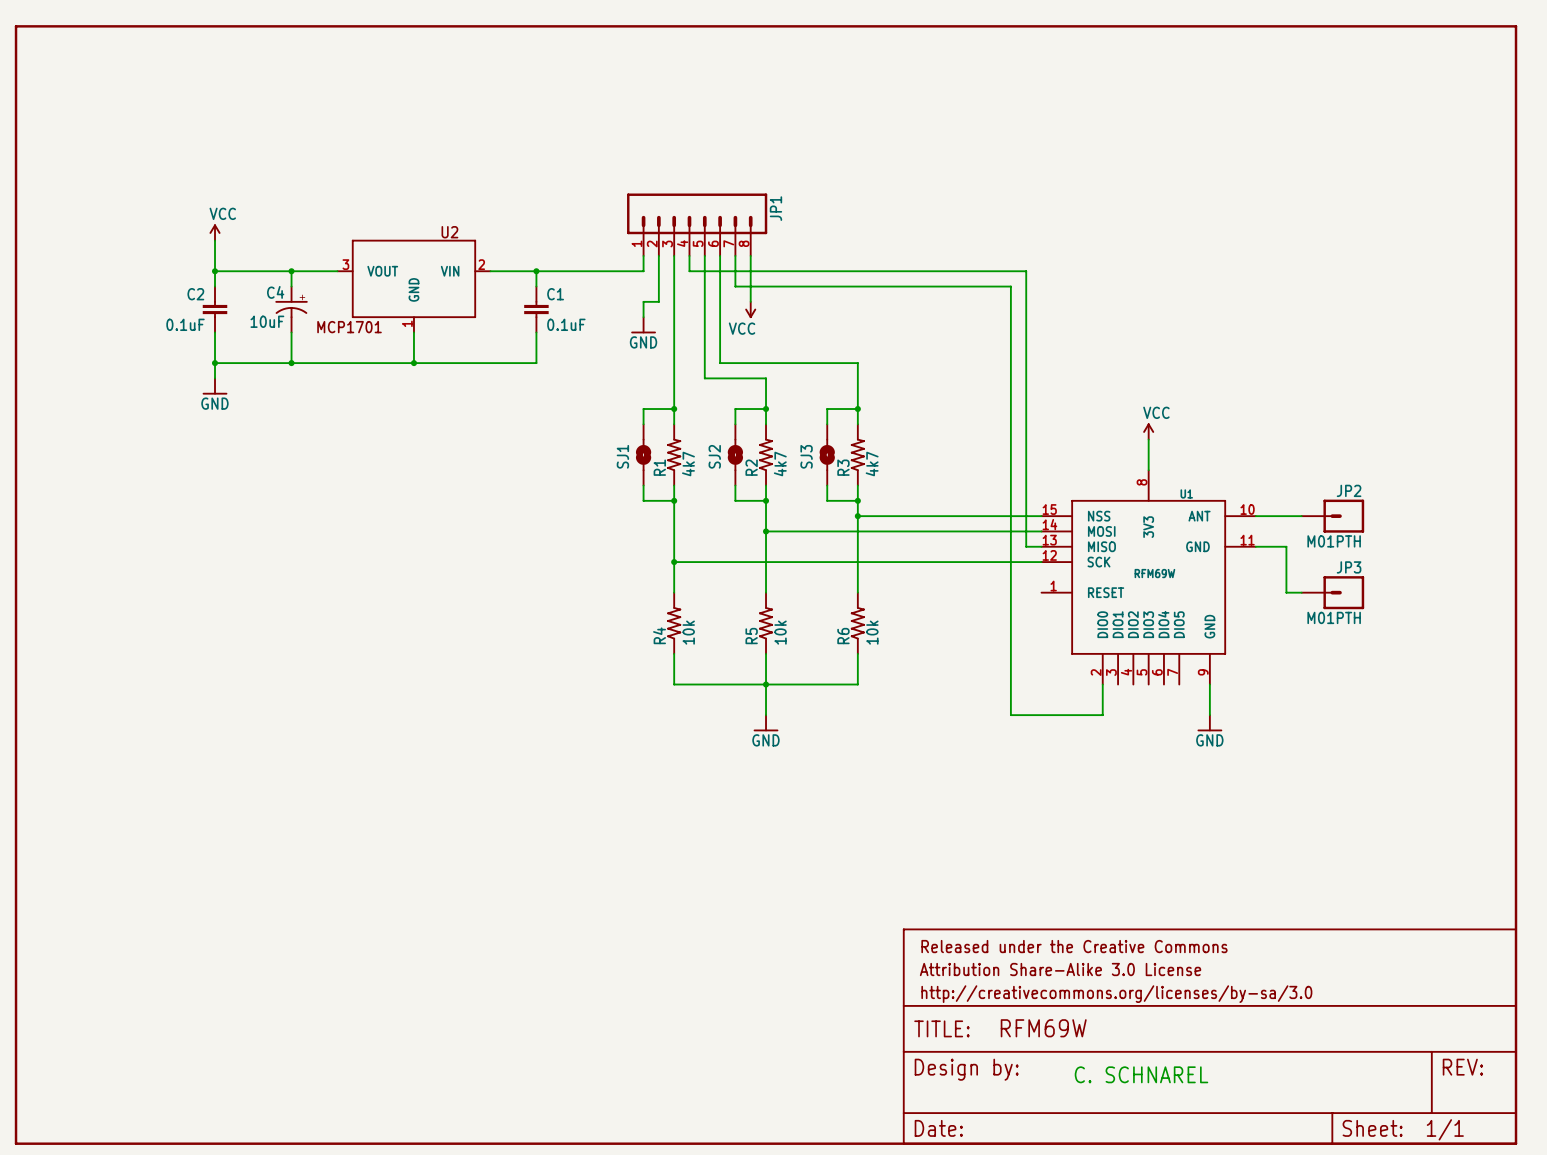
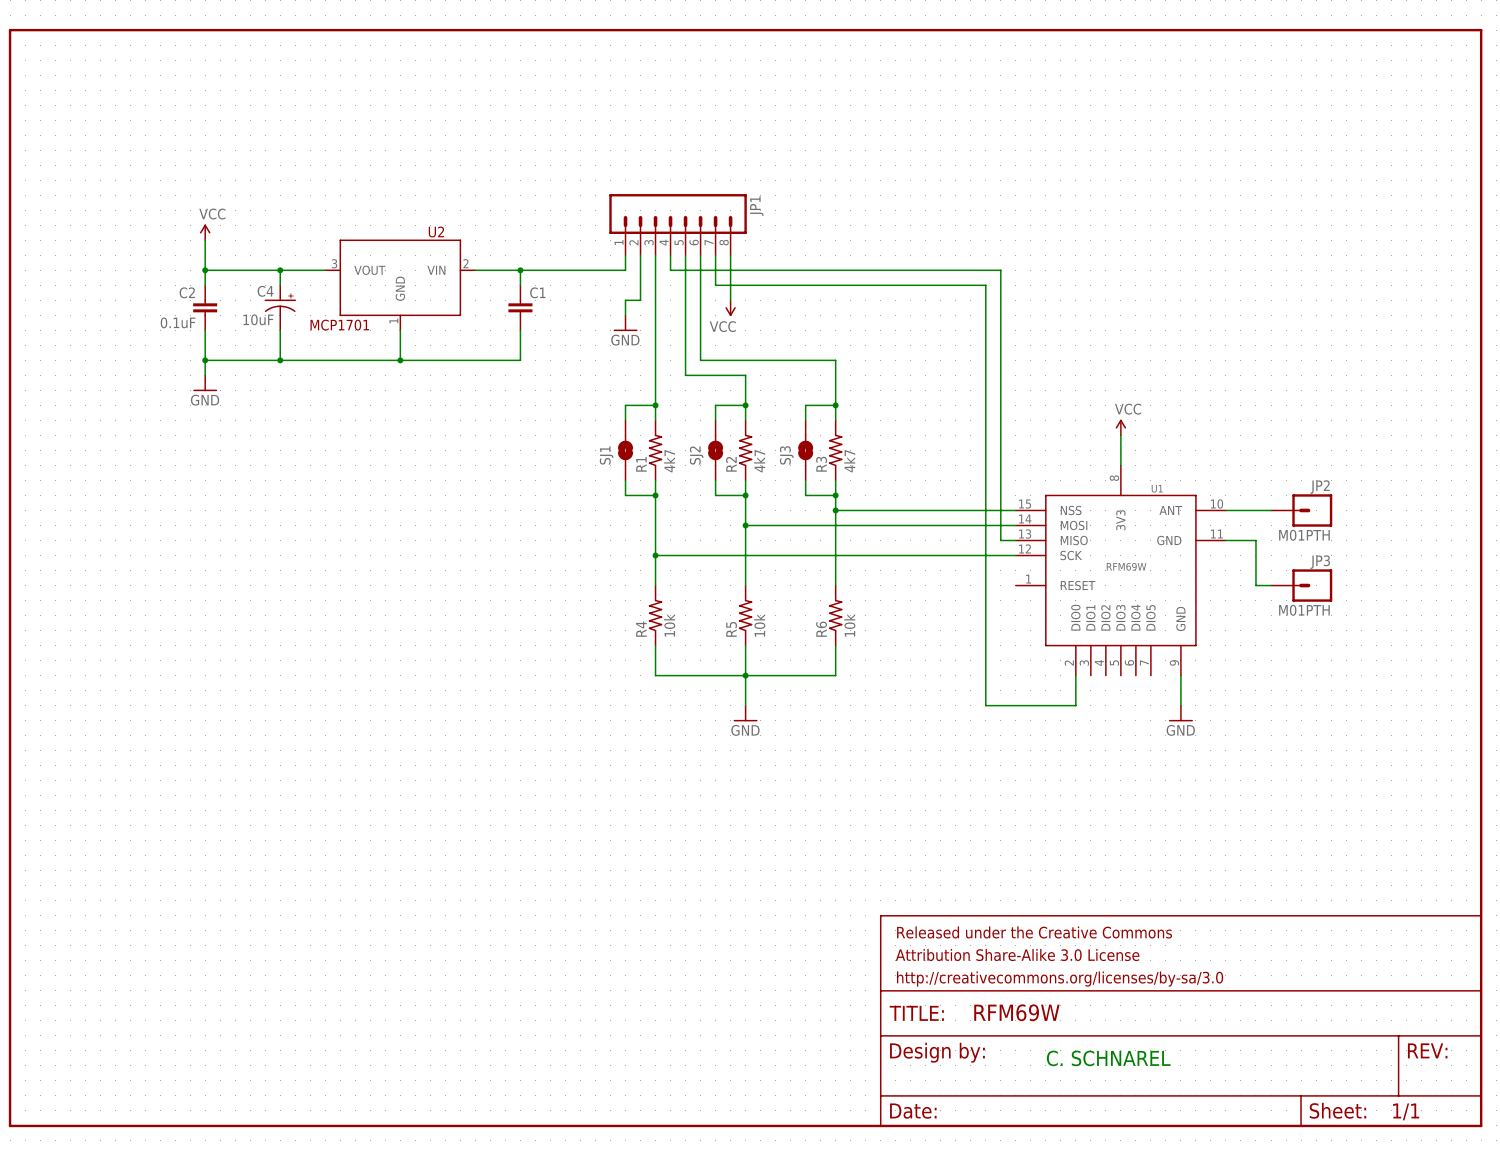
C1 value: 0.1uF (566, 324) -> none

